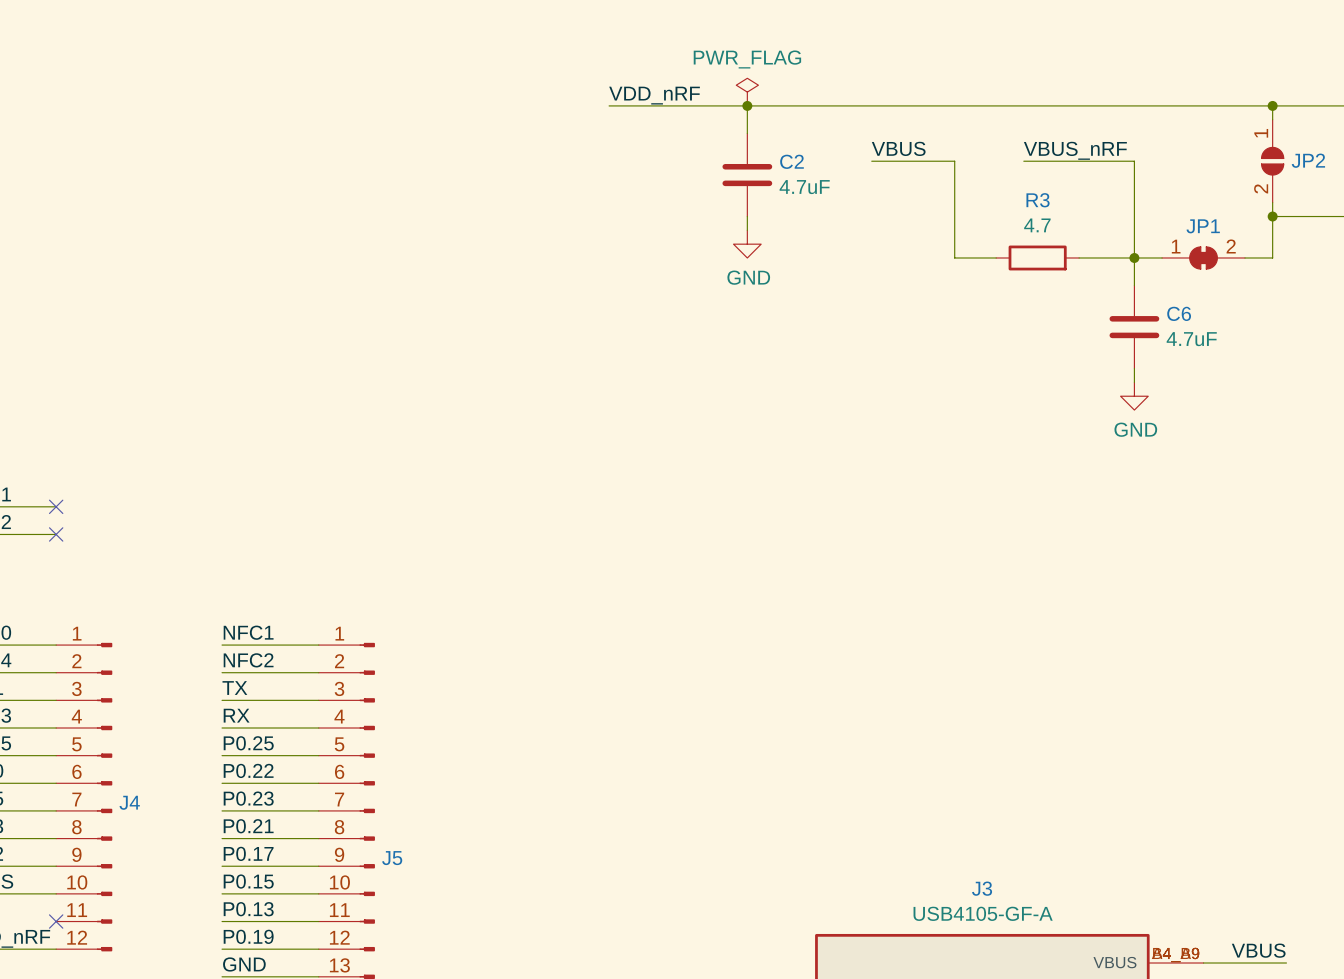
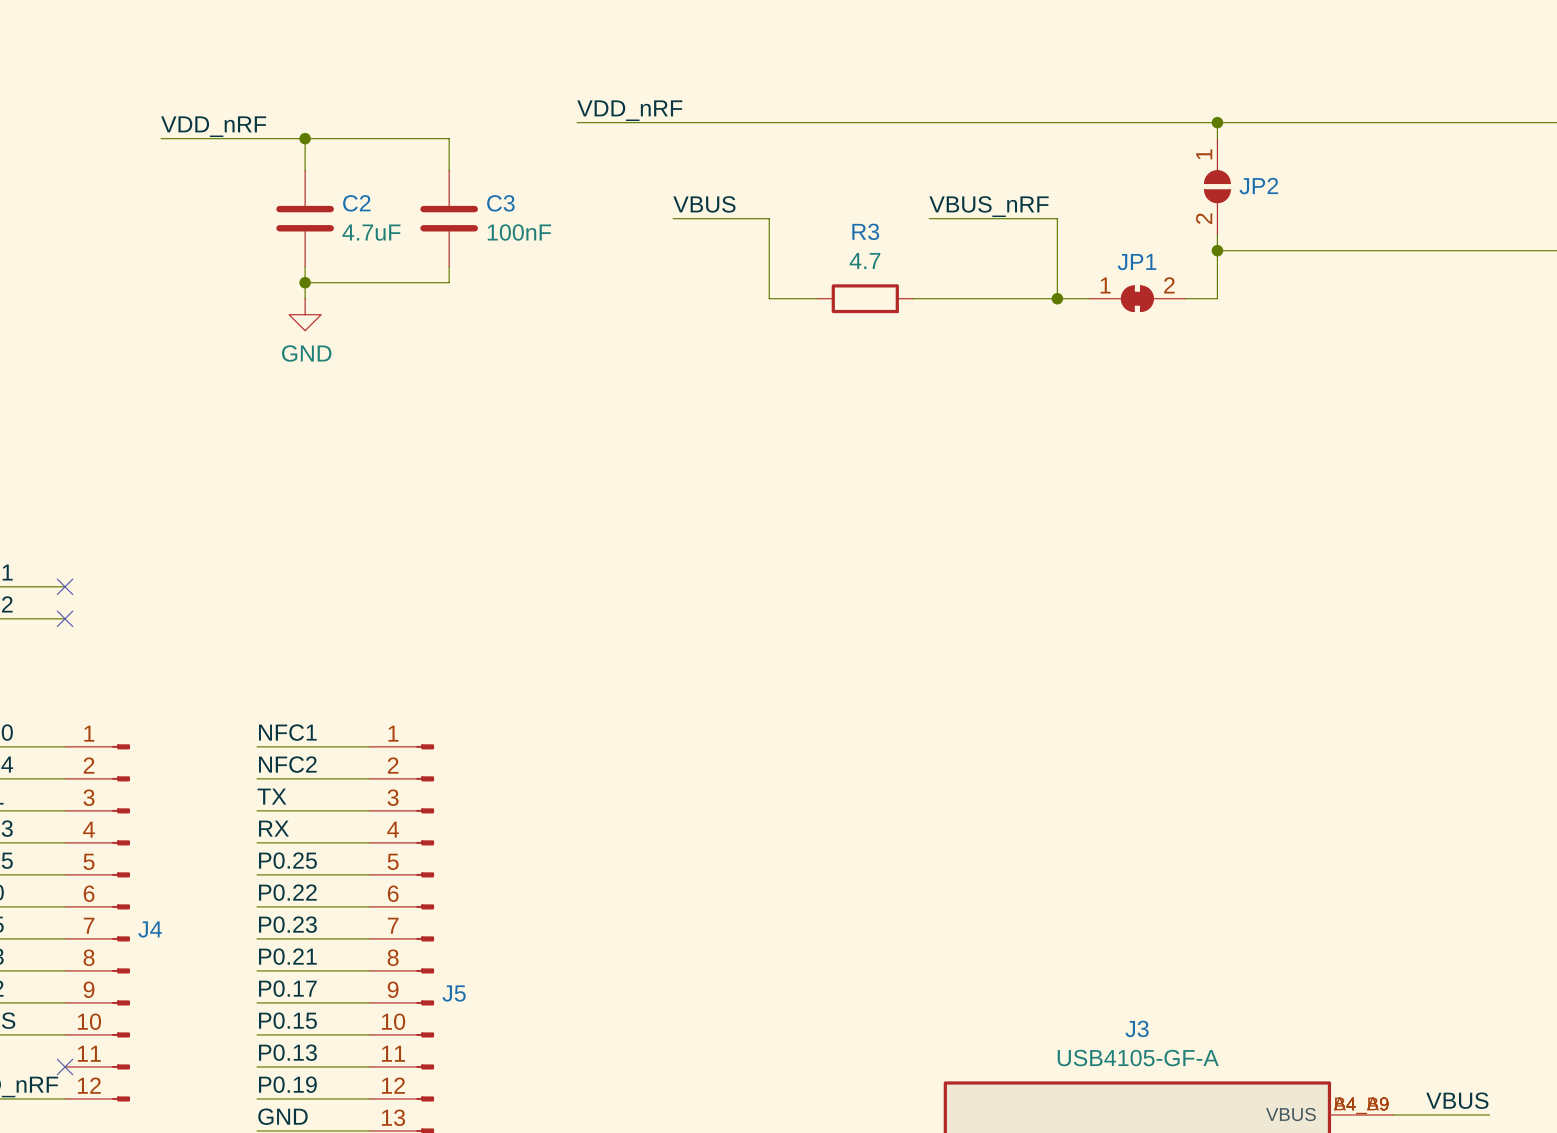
power symbol: PWR_FLAG (747, 92) -> none
label position: VDD_nRF (654, 95) -> VDD_nRF (629, 110)
wire: none -> (577, 122) (705, 122)
wire: (747, 105) (747, 133) -> none
junction: (747, 105) -> none
junction: none -> (1217, 122)
wire: (1272, 105) (1272, 119) -> (1217, 122) (1217, 138)
junction: (1272, 105) -> none
label: none -> VDD_nRF (213, 126)
wire: none -> (161, 138) (449, 138) (449, 170)
wire: none -> (305, 138) (305, 170)
junction: none -> (305, 138)
label: VBUS (898, 148) -> none
label position: VBUS_nRF (1075, 150) -> VBUS_nRF (989, 206)
wire: (871, 161) (954, 161) (954, 257) (996, 257) -> none
wire: (1023, 161) (1134, 161) (1134, 285) -> none
JP2 position: (1272, 161) -> (1217, 186)
C2 position: (747, 175) -> (305, 218)
label: none -> VBUS (704, 204)
C3: none -> 100nF (449, 218)
wire: none -> (673, 218) (769, 218) (769, 298) (817, 298)
wire: none -> (929, 218) (1057, 218) (1057, 298)
wire: (1272, 202) (1272, 257) (1245, 257) -> (1217, 234) (1217, 298) (1185, 298)
wire: (747, 216) (747, 230) -> none
wire: none -> (1217, 250) (1473, 250)
junction: none -> (1217, 250)
junction: (1272, 216) -> none
wire: none -> (305, 266) (305, 298)
wire: none -> (449, 266) (449, 282) (305, 282)
junction: none -> (305, 282)
power symbol: GND (747, 244) -> none
wire: none -> (913, 298) (1089, 298)
junction: none -> (1057, 298)
R3 position: (1037, 257) -> (865, 298)
wire: (1079, 257) (1162, 257) -> none
junction: (1134, 257) -> none
JP1 position: (1203, 257) -> (1137, 298)
power symbol: none -> GND (305, 314)
C6: 4.7uF (1134, 327) -> none
wire: (1134, 368) (1134, 382) -> none
power symbol: GND (1134, 396) -> none

